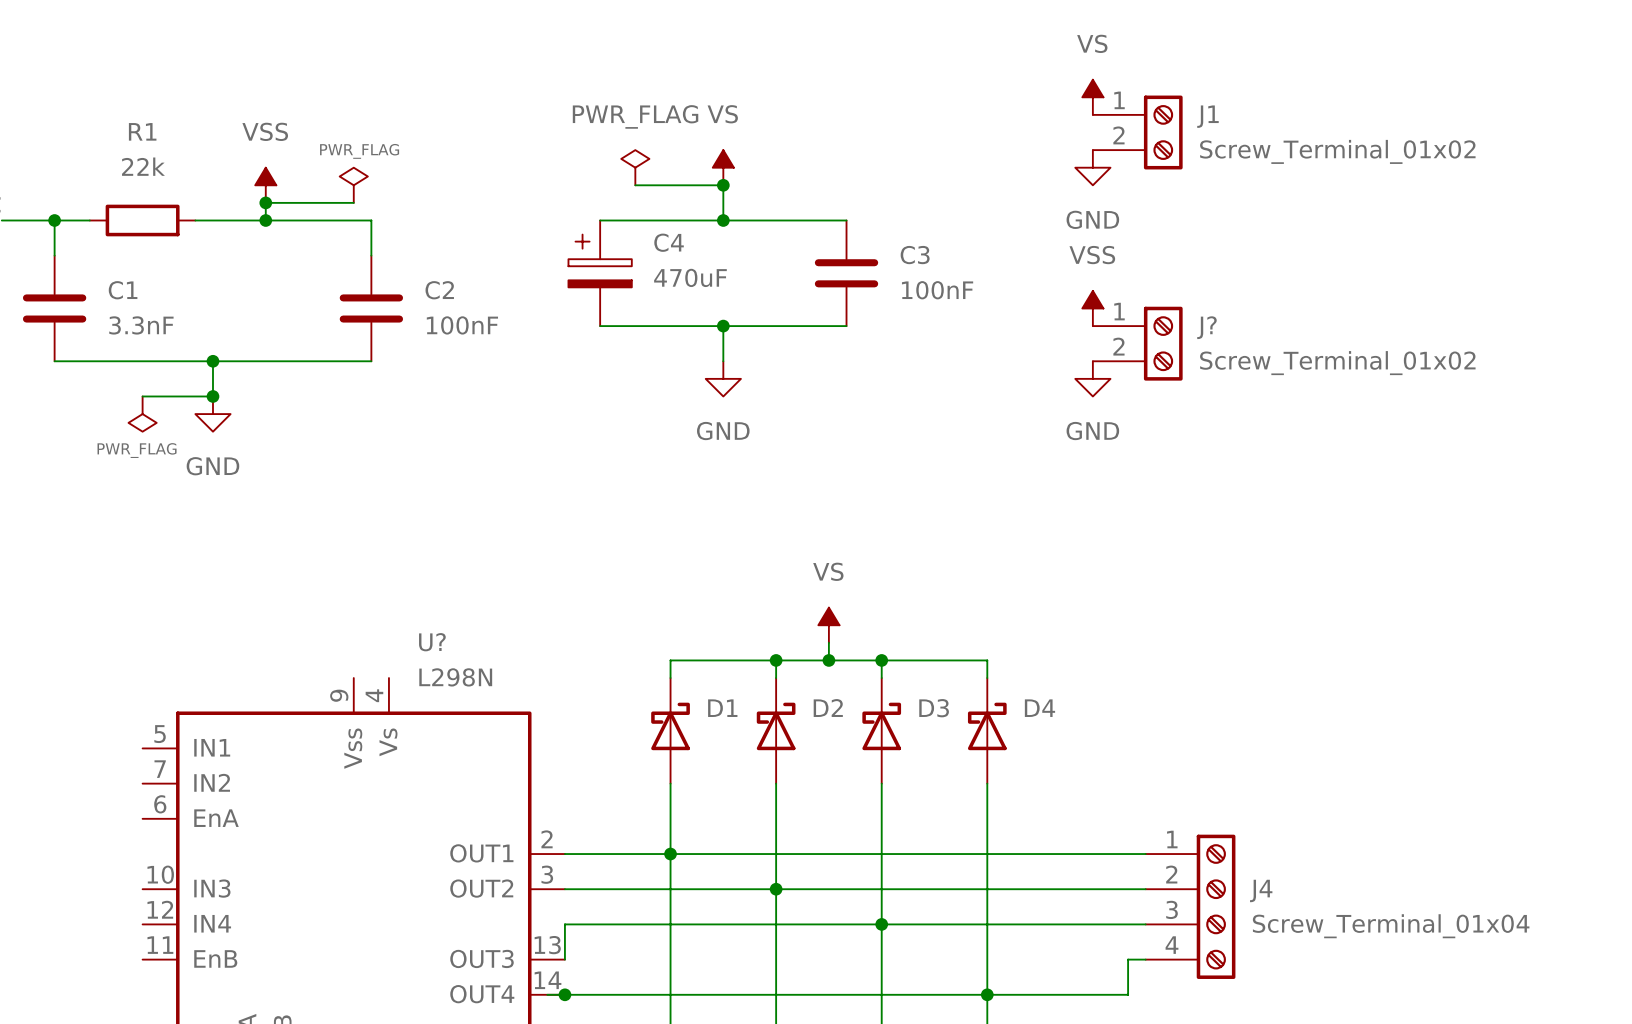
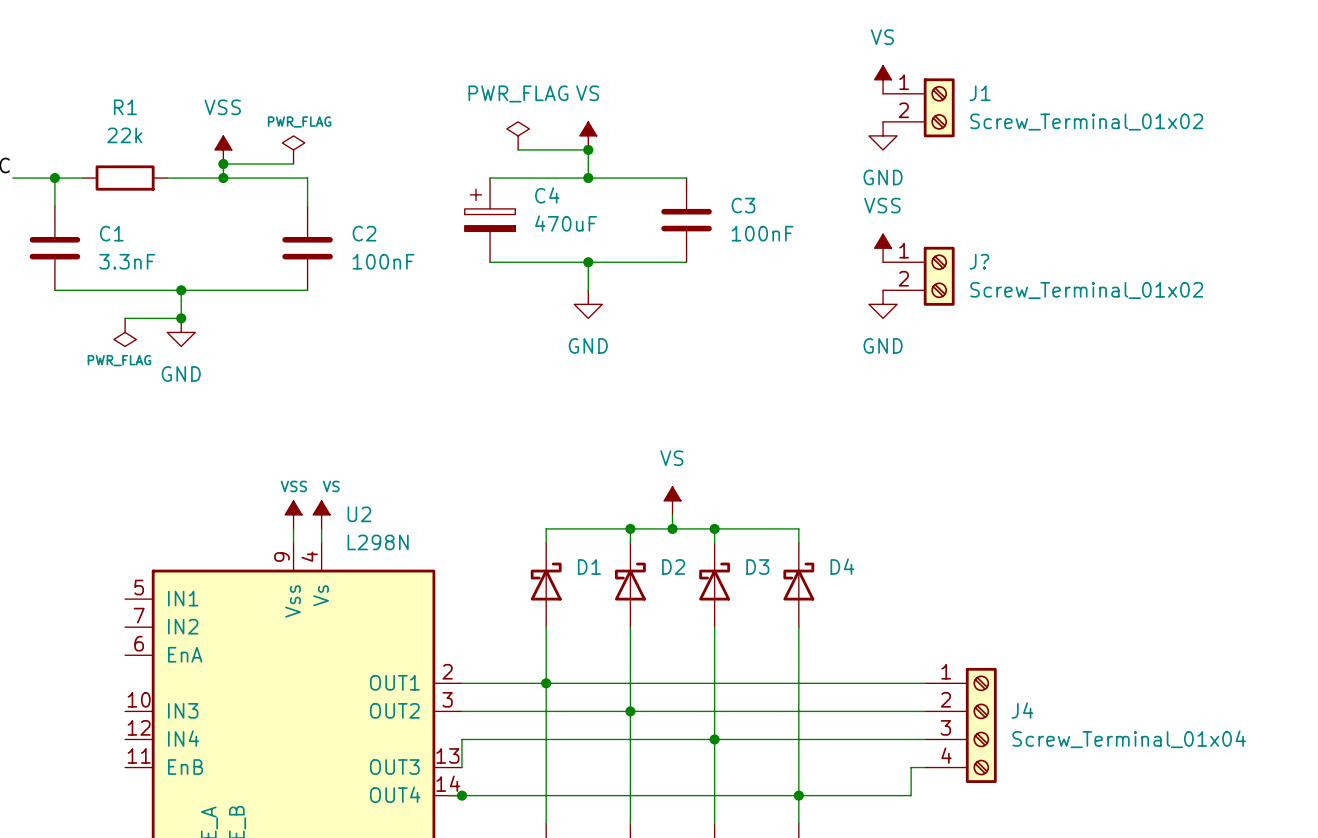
power symbol: none -> VSS (293, 514)
power symbol: none -> VS (321, 514)
U? name: U? (432, 642) -> U2 (359, 514)
wire: none -> (293, 528) (293, 542)
wire: none -> (321, 528) (321, 542)

